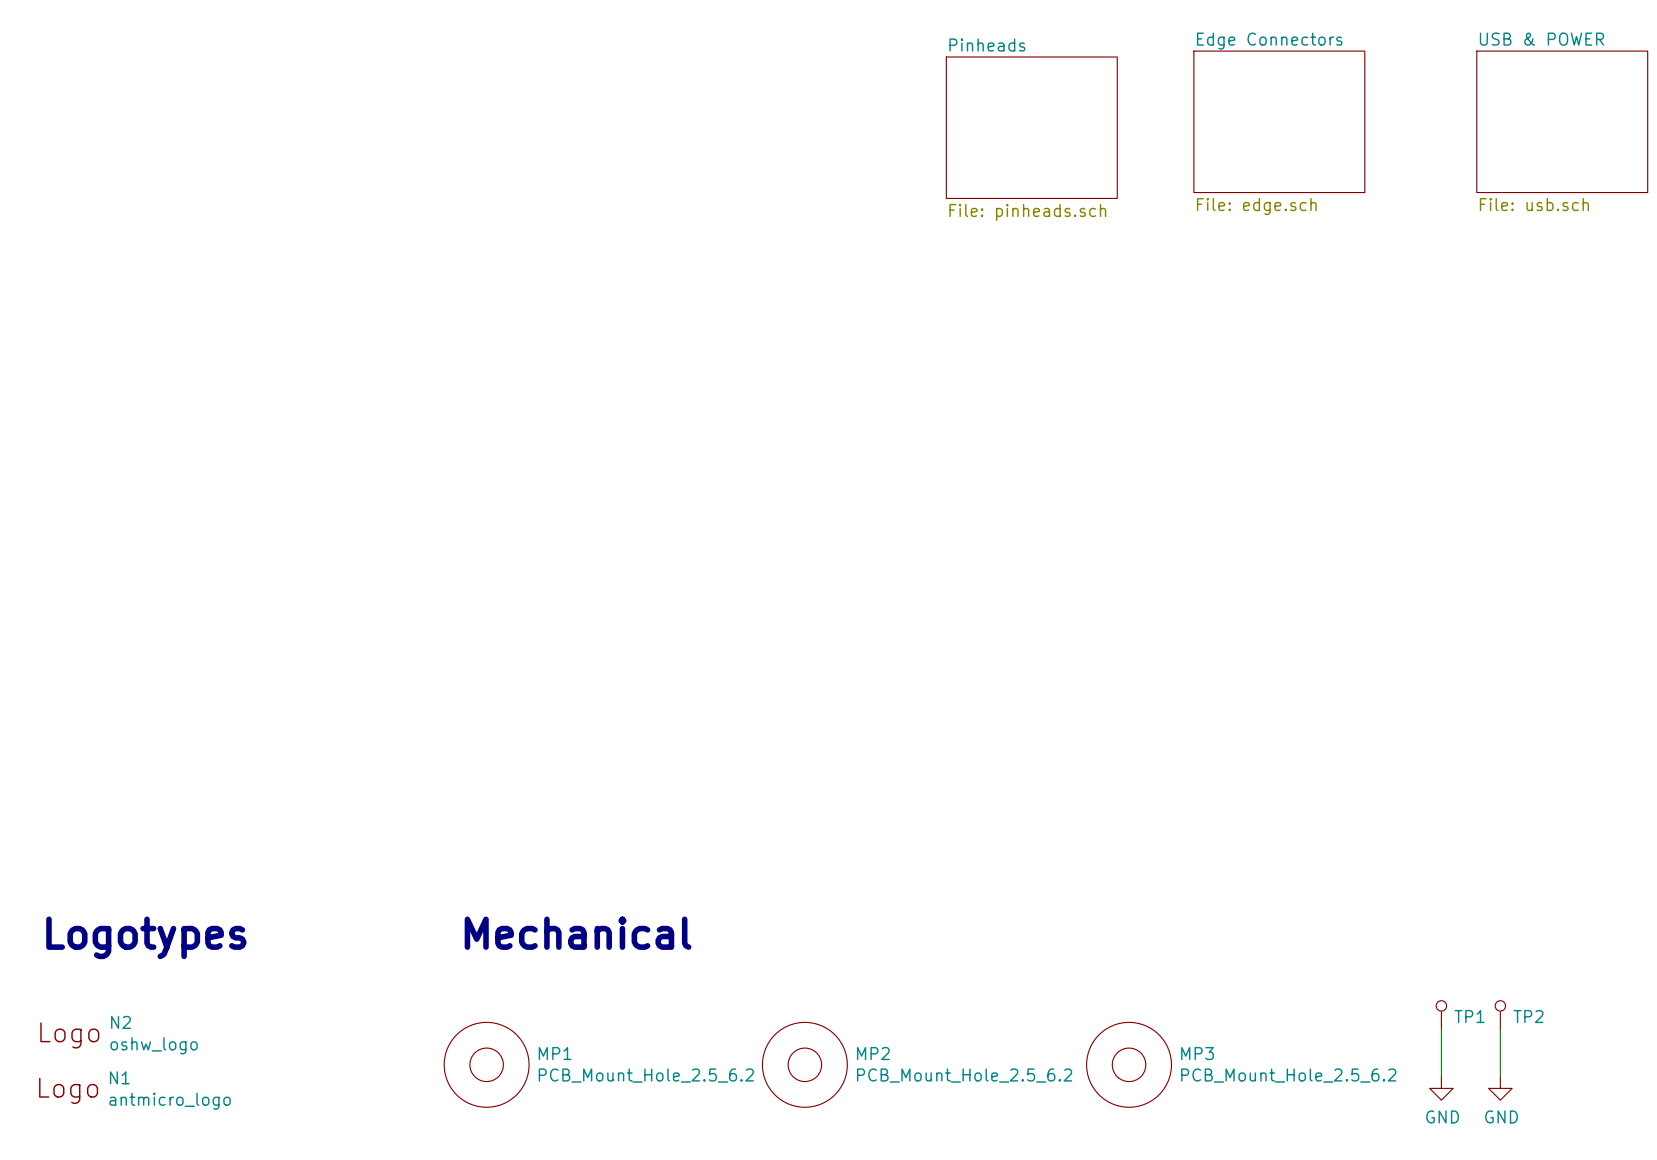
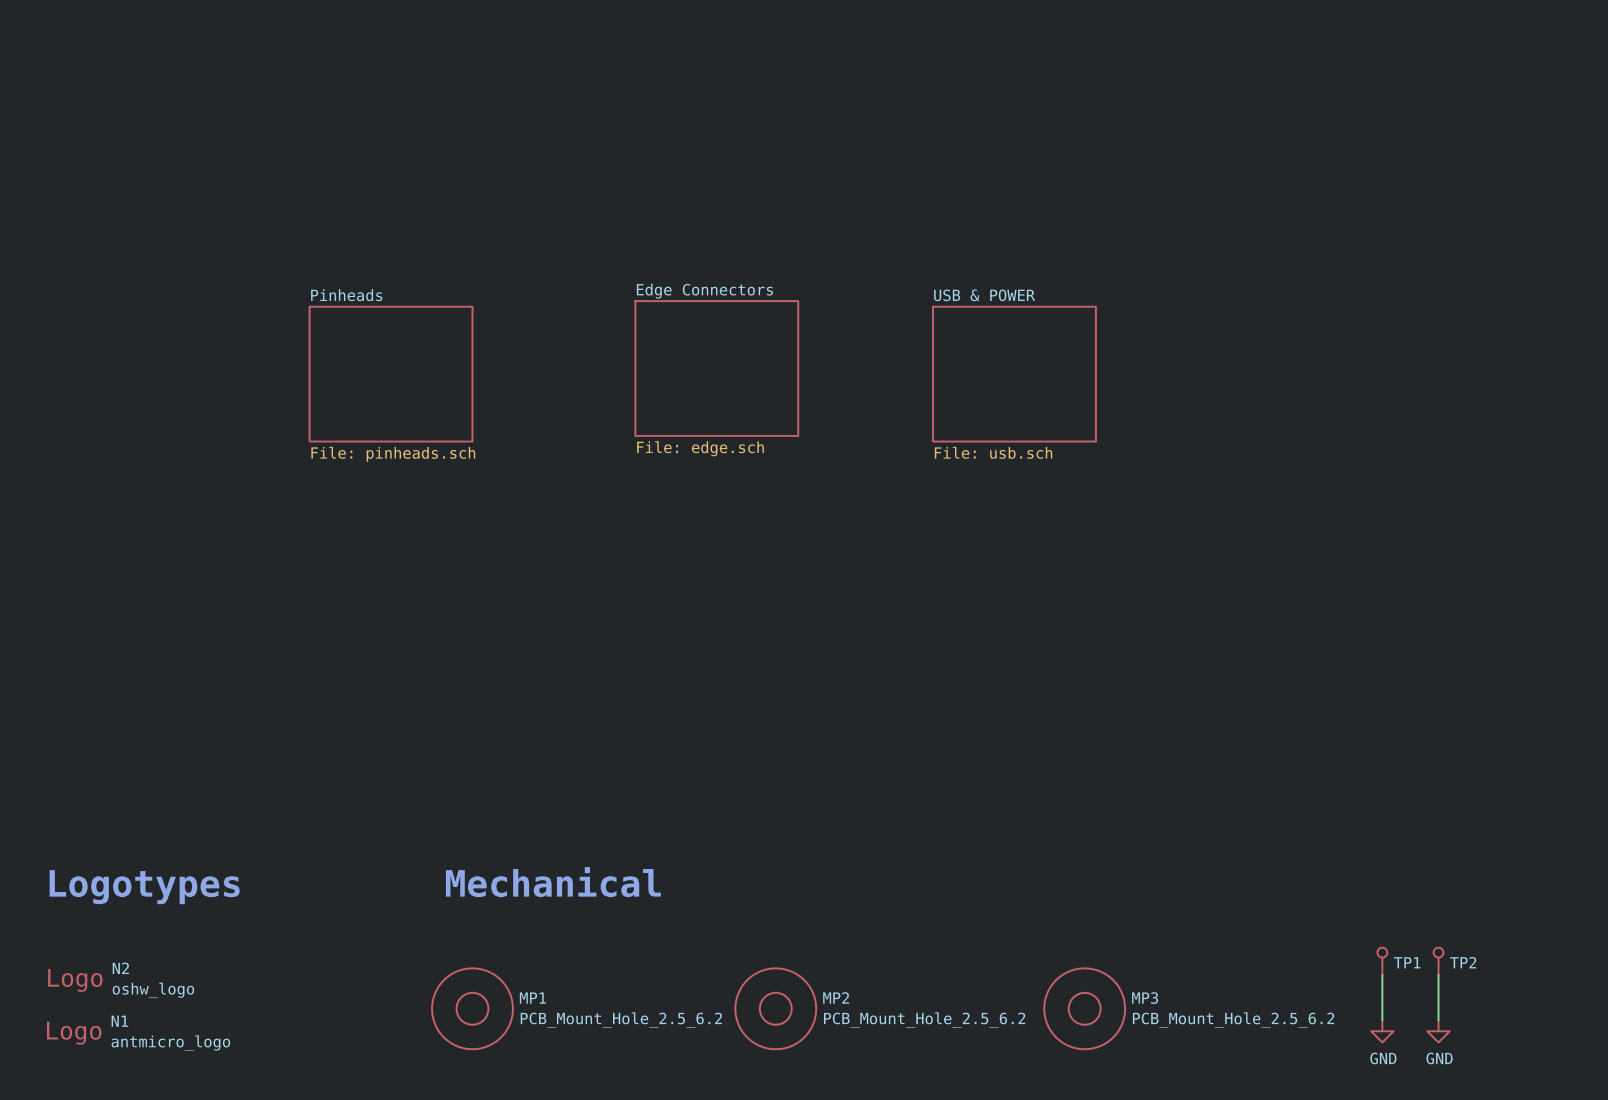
sheet Edge Connectors: File: edge.sch (1279, 121) -> none
sheet USB & POWER: File: usb.sch (1562, 121) -> none
sheet Pinheads: File: pinheads.sch (1031, 127) -> none
sheet Edge Connectors: none -> File: edge.sch (716, 368)
sheet Pinheads: none -> File: pinheads.sch (391, 374)
sheet USB & POWER: none -> File: usb.sch (1014, 374)

